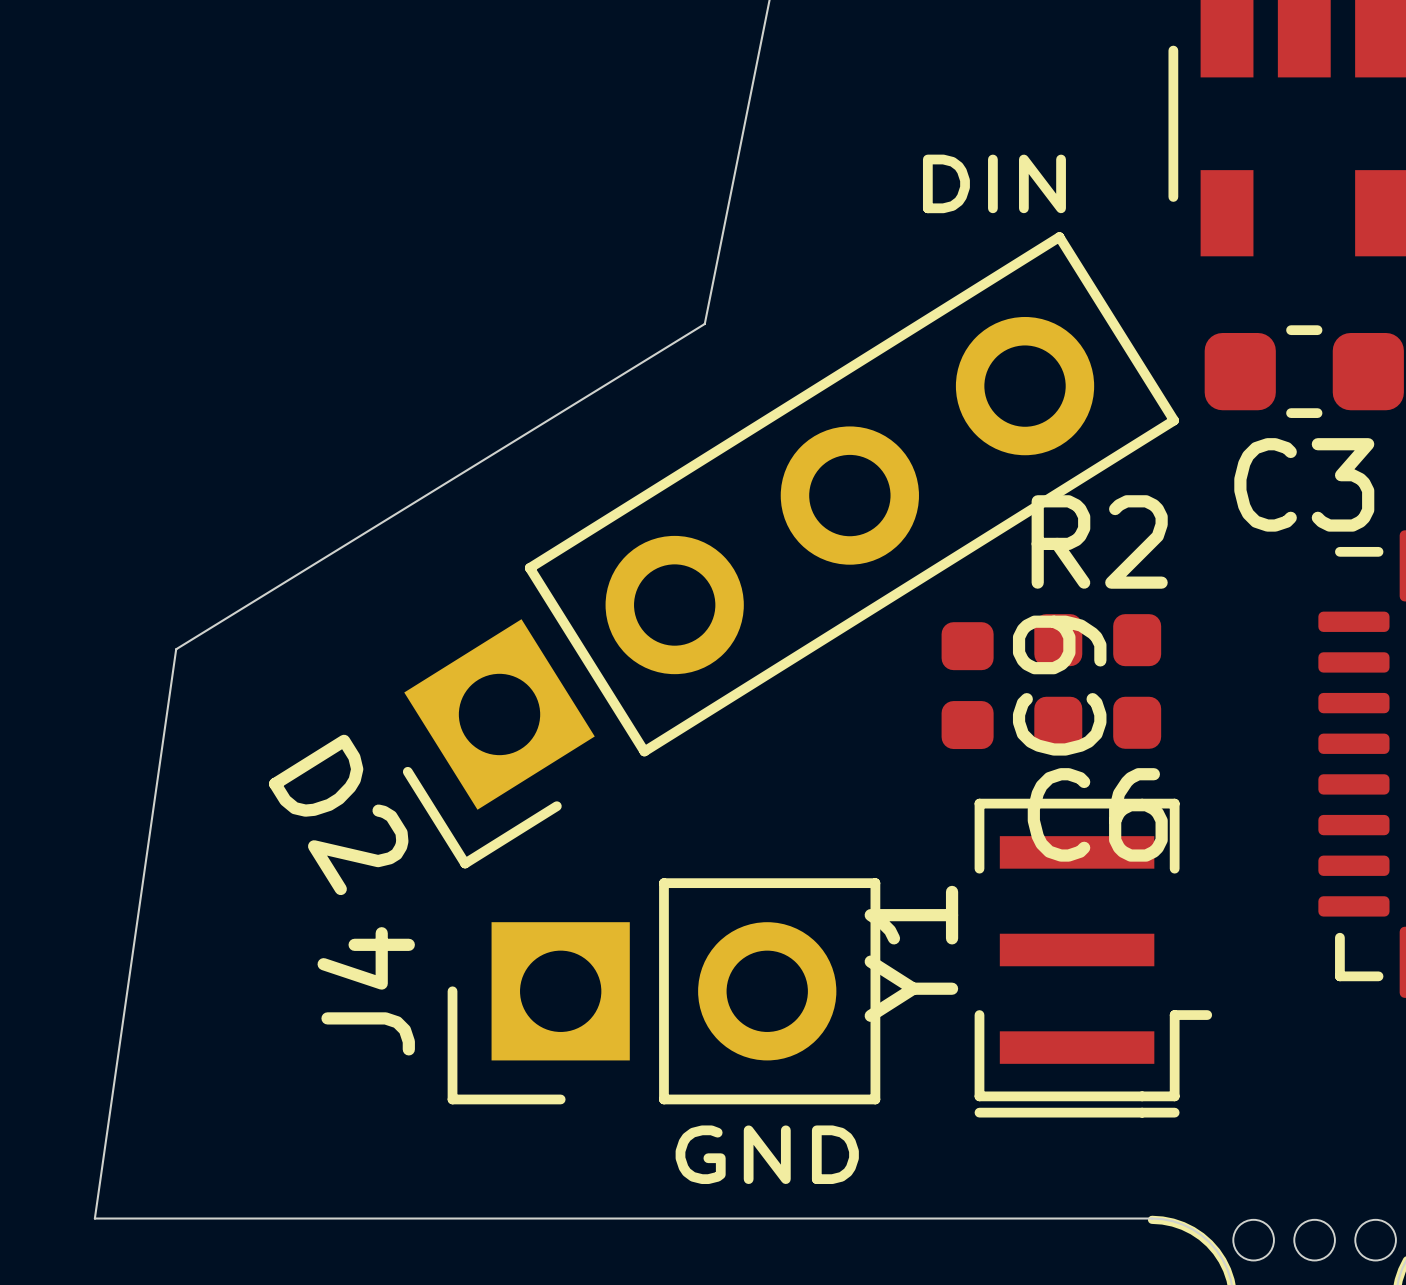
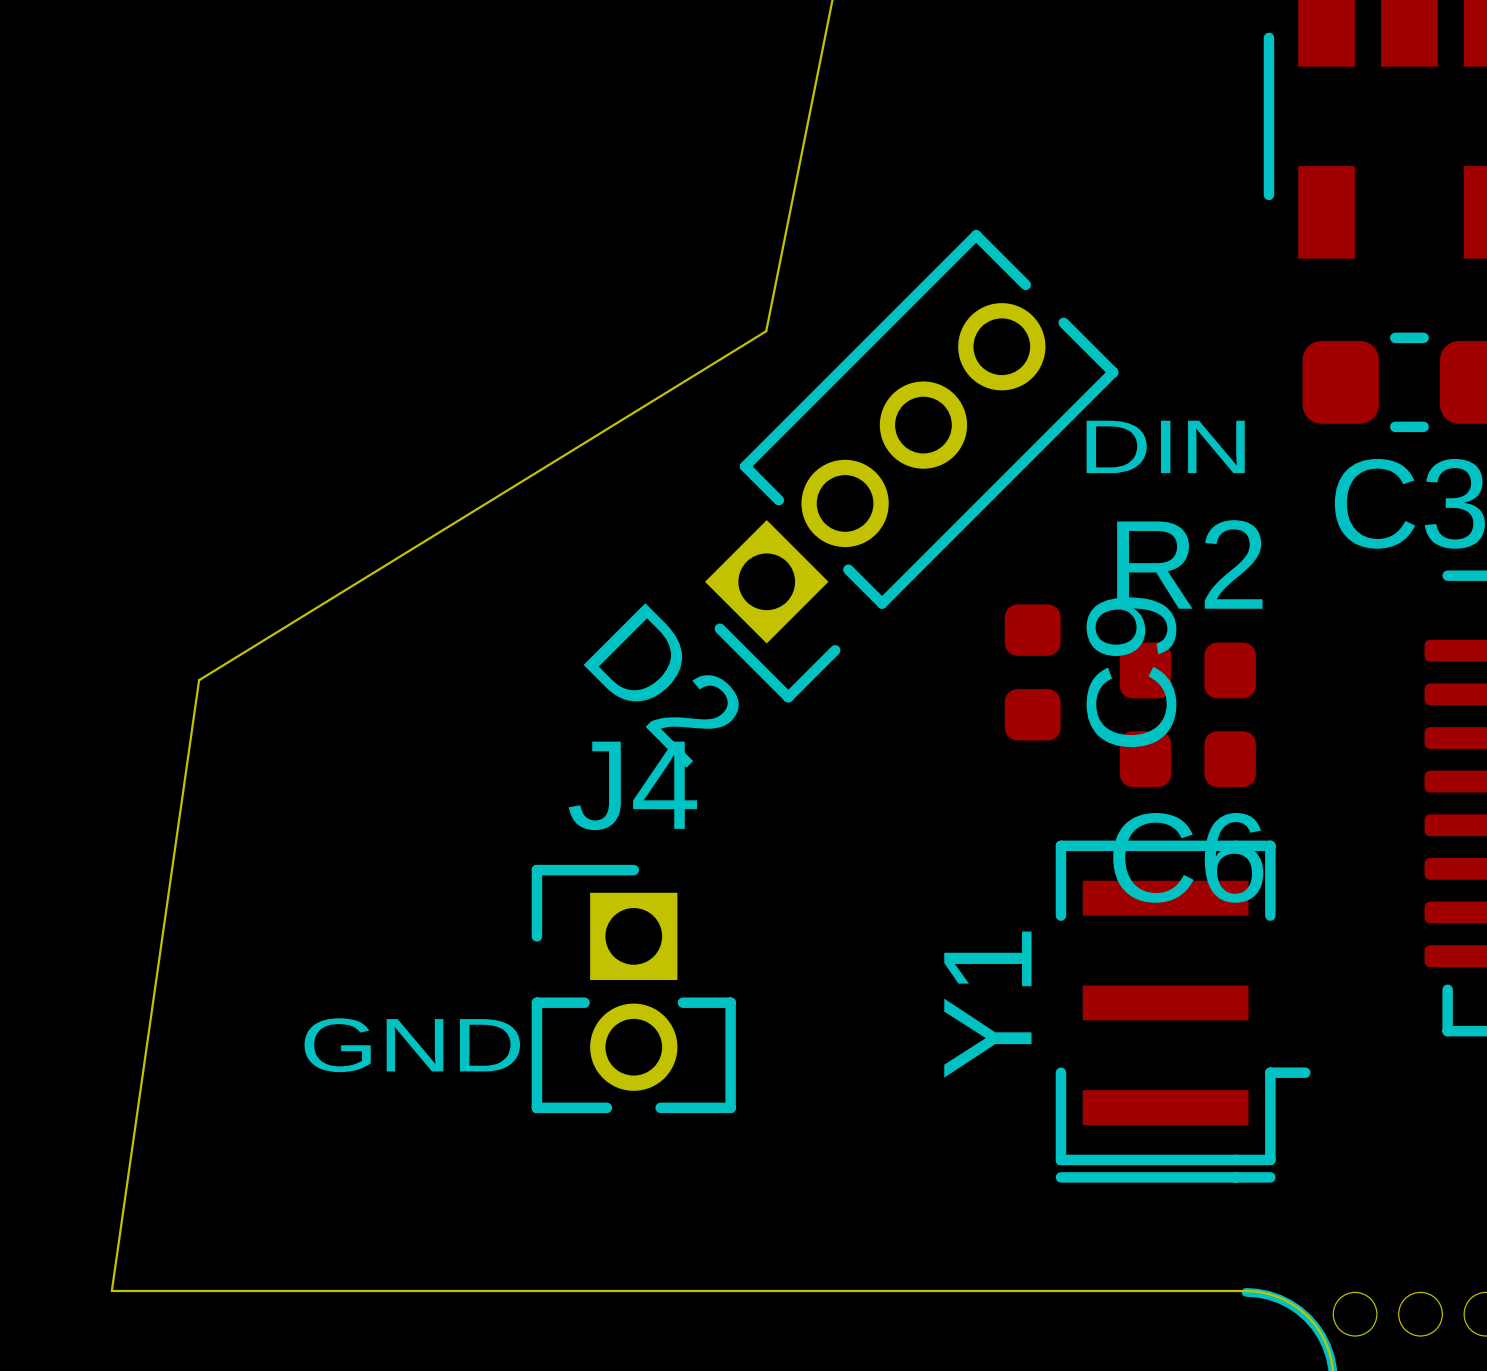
text position: DIN (994, 183) -> DIN (1165, 446)
D2 footprint: [402, 232, 1179, 869] -> [705, 230, 1119, 703]
C9 position: (967, 685) -> (1032, 672)
D2 name position: D2 (338, 814) -> D2 (661, 685)
J4 footprint: [447, 878, 881, 1105] -> [531, 864, 736, 1114]
J4 name position: J4 (366, 991) -> J4 (632, 785)
text position: GND (767, 1154) -> GND (412, 1045)

